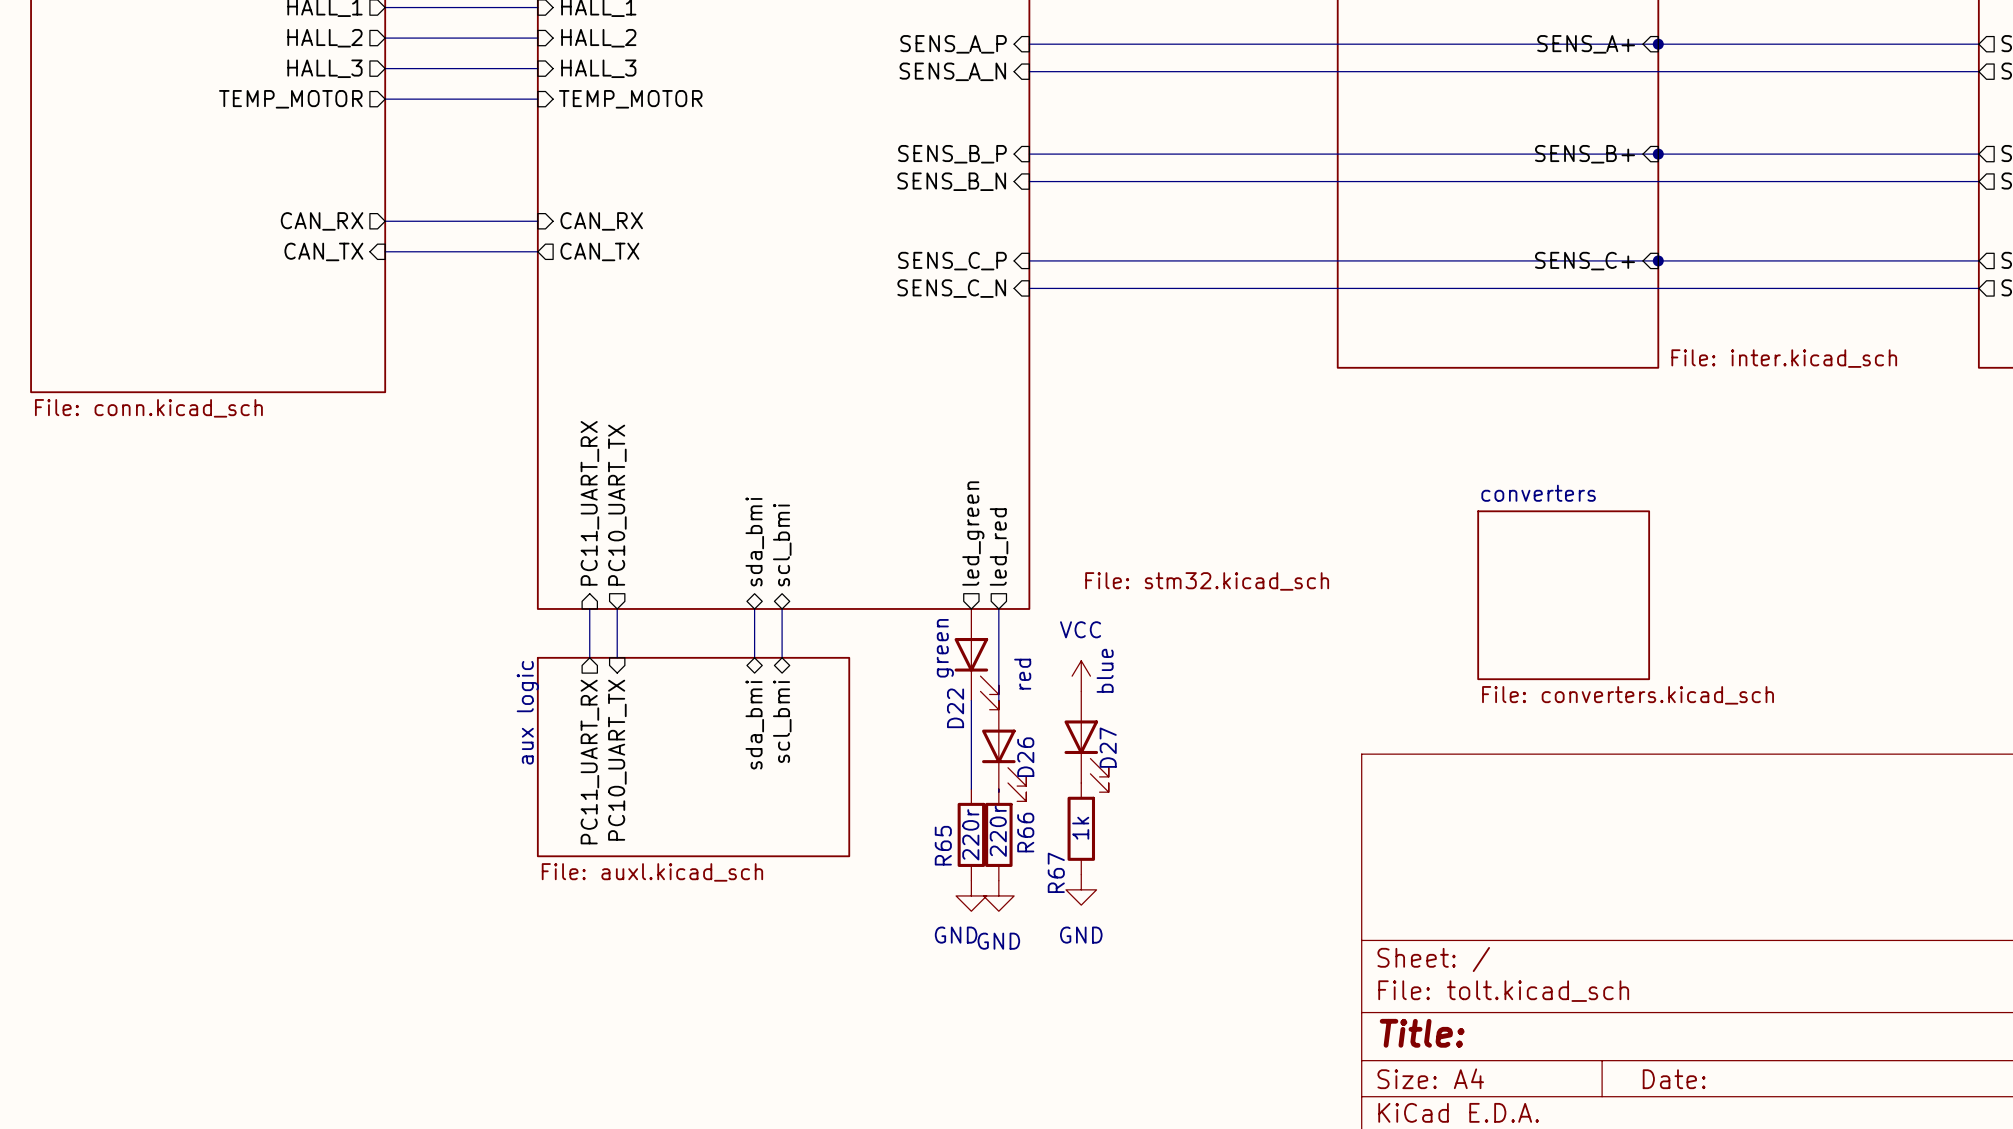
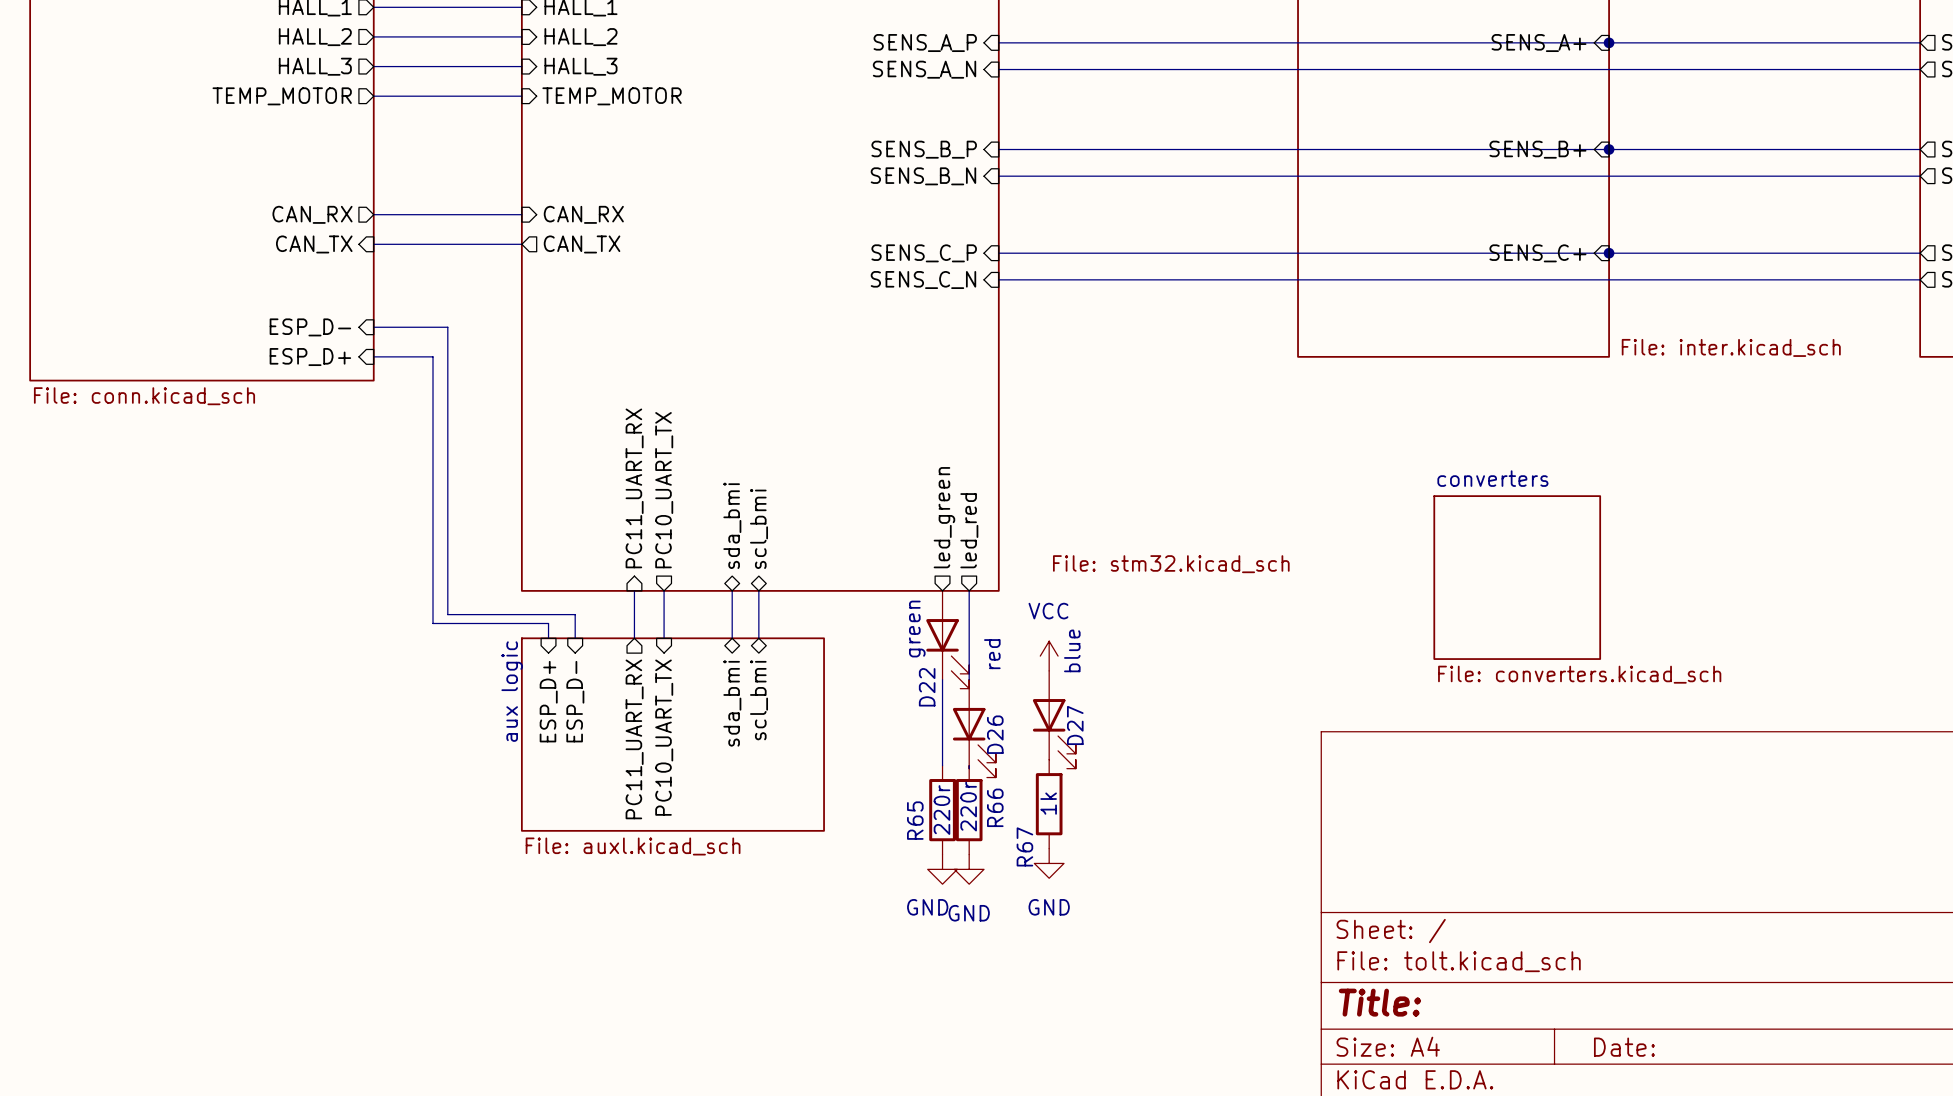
sheet pin: none -> ESP_D- (310, 327)
wire: none -> (373, 327) (447, 327) (447, 614) (575, 614) (575, 638)
sheet pin: none -> ESP_D+ (310, 357)
wire: none -> (373, 356) (433, 356) (433, 623) (548, 623) (548, 638)
sheet pin: PC11_UART_RX (589, 503) -> none
sheet pin: none -> PC11_UART_RX (634, 488)
sheet pin: PC10_UART_TX (617, 505) -> none
sheet pin: none -> PC10_UART_TX (664, 490)
wire: (589, 608) (589, 657) -> (664, 590) (664, 638)
wire: (617, 608) (617, 657) -> (634, 590) (634, 638)
sheet pin: none -> ESP_D+ (548, 701)
sheet pin: PC10_UART_TX (617, 760) -> none
sheet pin: none -> PC10_UART_TX (664, 737)
sheet pin shape: output (589, 762) -> input (575, 701)
sheet pin: PC11_UART_RX (589, 762) -> ESP_D- (575, 701)
sheet pin: none -> PC11_UART_RX (634, 739)

